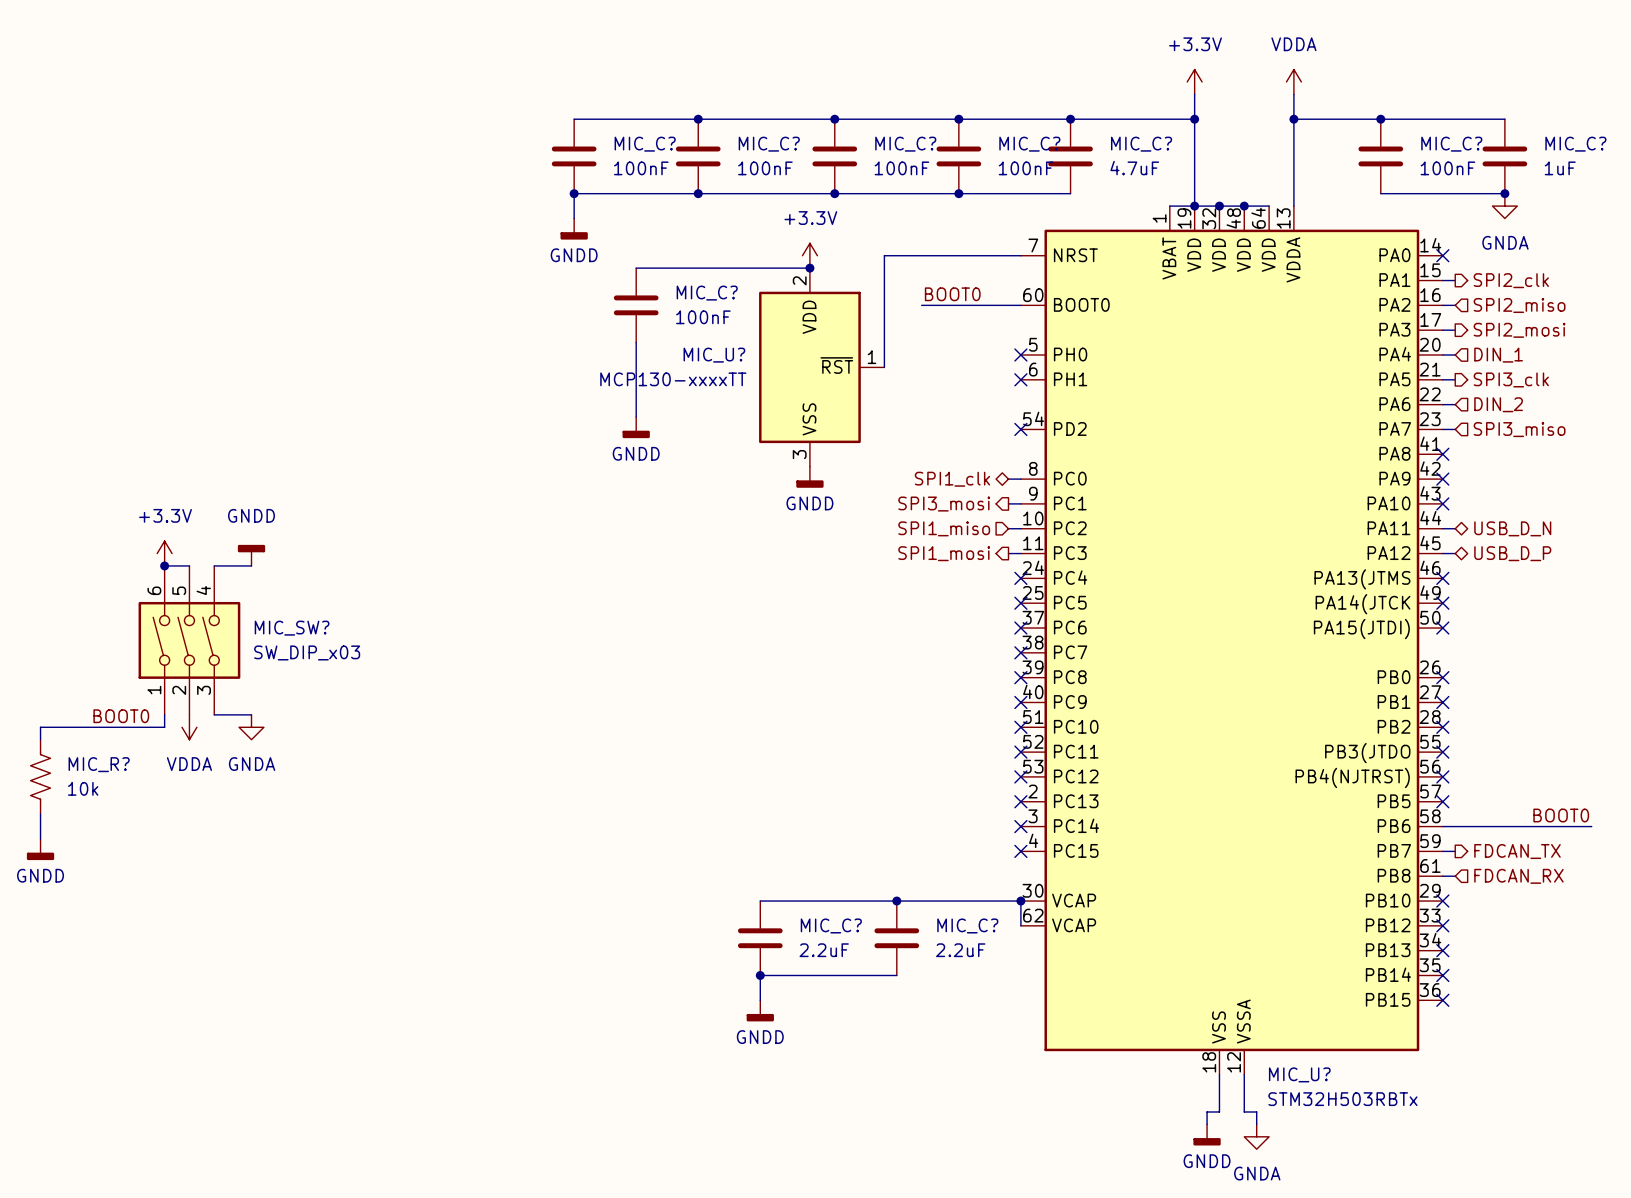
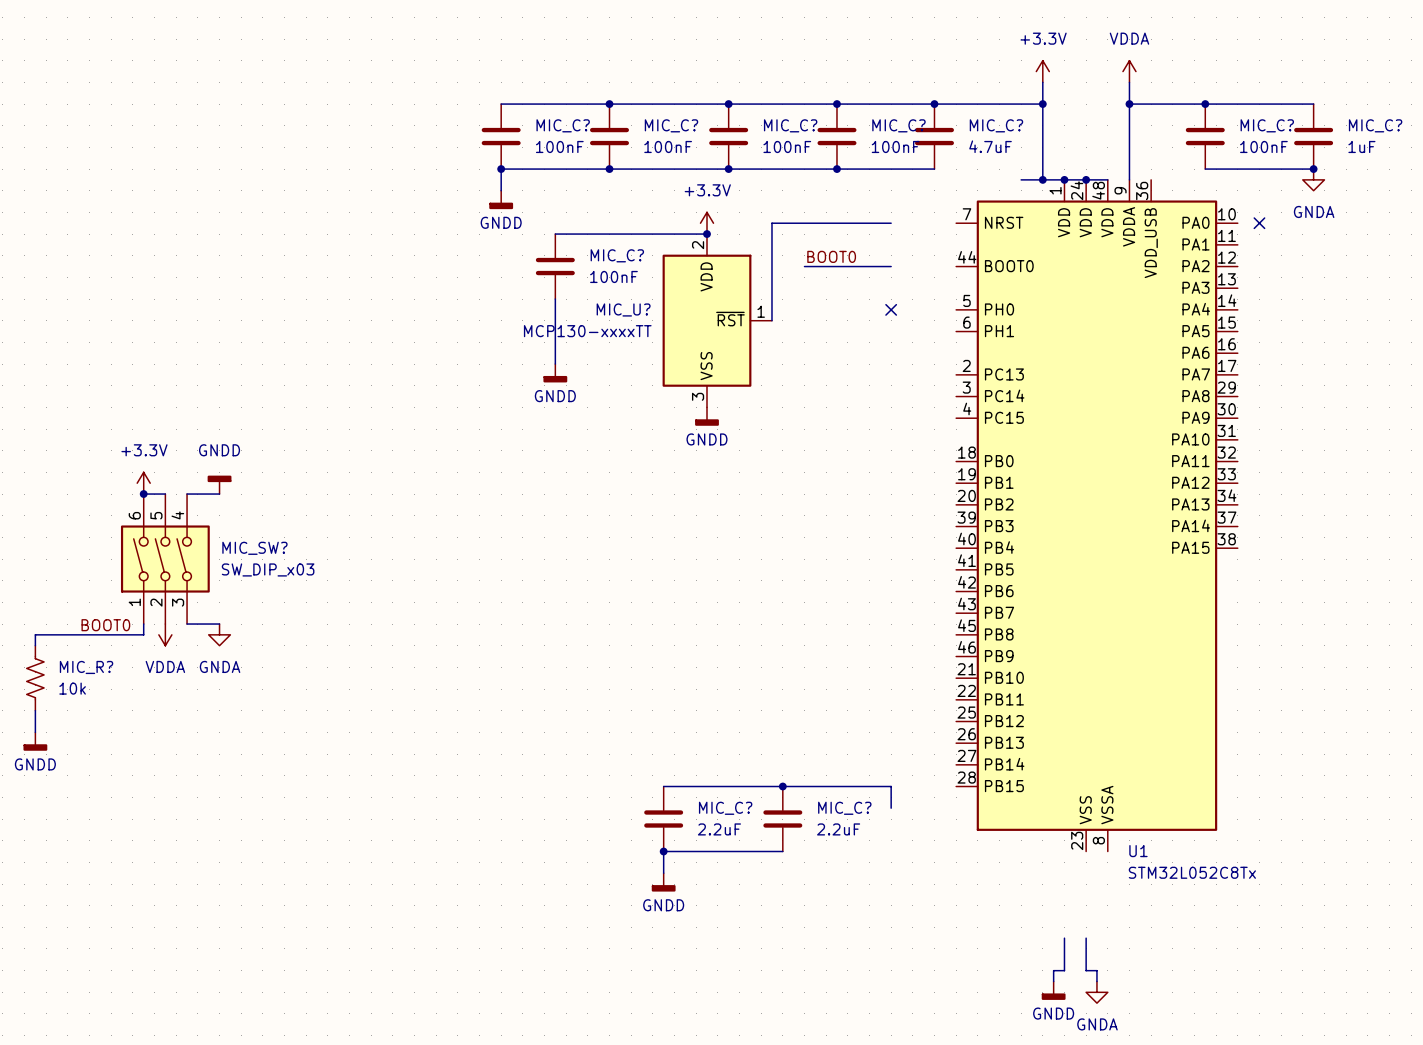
wire: (1442, 280) (1455, 280) -> none
hierarchical label: SPI2_clk (1511, 280) -> none
wire: (1442, 305) (1455, 305) -> none
hierarchical label: SPI2_miso (1519, 305) -> none
wire: (1442, 330) (1455, 330) -> none
hierarchical label: SPI2_mosi (1519, 330) -> none
wire: (1442, 355) (1455, 355) -> none
hierarchical label: DIN_1 (1498, 355) -> none
no-connect mark: (1020, 379) -> none
wire: (1442, 379) (1455, 379) -> none
hierarchical label: SPI3_clk (1511, 379) -> none
wire: (1442, 404) (1455, 404) -> none
hierarchical label: DIN_2 (1498, 404) -> none
no-connect mark: (1020, 429) -> none
wire: (1442, 429) (1455, 429) -> none
hierarchical label: SPI3_miso (1519, 429) -> none
no-connect mark: (1442, 454) -> none
hierarchical label: SPI1_clk (952, 479) -> none
wire: (1008, 479) (1020, 479) -> none
no-connect mark: (1442, 479) -> none
wire: (1008, 503) (1020, 503) -> none
no-connect mark: (1442, 503) -> none
hierarchical label: SPI3_mosi (944, 504) -> none
hierarchical label: SPI1_miso (944, 528) -> none
wire: (1008, 528) (1020, 528) -> none
wire: (1442, 528) (1455, 528) -> none
hierarchical label: USB_D_N (1512, 528) -> none
hierarchical label: SPI1_mosi (944, 553) -> none
wire: (1008, 553) (1020, 553) -> none
wire: (1442, 553) (1455, 553) -> none
hierarchical label: USB_D_P (1512, 553) -> none
no-connect mark: (1020, 578) -> none
no-connect mark: (1442, 578) -> none
U1: none -> STM32L052C8Tx (1096, 515)
no-connect mark: (1020, 603) -> none
no-connect mark: (1442, 603) -> none
no-connect mark: (1020, 628) -> none
no-connect mark: (1442, 628) -> none
MIC_U?: STM32H503RBTx (1231, 640) -> none
no-connect mark: (1020, 652) -> none
no-connect mark: (1020, 677) -> none
no-connect mark: (1442, 677) -> none
no-connect mark: (1020, 702) -> none
no-connect mark: (1442, 702) -> none
no-connect mark: (1020, 727) -> none
no-connect mark: (1442, 727) -> none
no-connect mark: (1020, 752) -> none
no-connect mark: (1442, 752) -> none
no-connect mark: (1020, 776) -> none
no-connect mark: (1442, 776) -> none
no-connect mark: (1020, 801) -> none
no-connect mark: (1442, 801) -> none
label: BOOT0 (1561, 815) -> none
no-connect mark: (1020, 826) -> none
wire: (1442, 826) (1591, 826) -> none
no-connect mark: (1020, 851) -> none
wire: (1442, 851) (1455, 851) -> none
hierarchical label: FDCAN_TX (1517, 851) -> none
wire: (1442, 876) (1455, 876) -> none
hierarchical label: FDCAN_RX (1518, 876) -> none
junction: (1020, 901) -> none
no-connect mark: (1442, 901) -> none
no-connect mark: (1442, 925) -> none
no-connect mark: (1442, 950) -> none
no-connect mark: (1442, 975) -> none
no-connect mark: (1442, 1000) -> none

